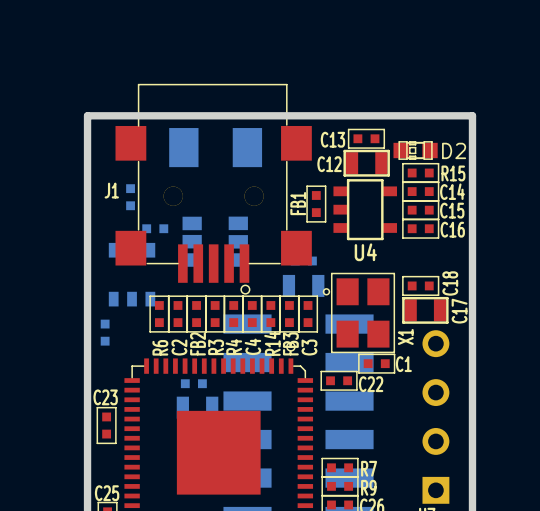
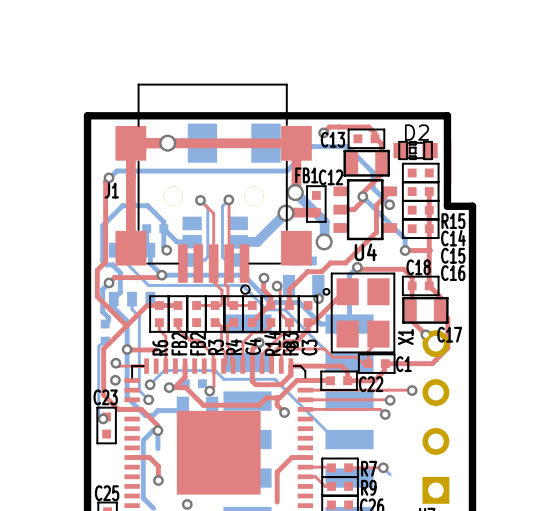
board edge: (447, 115) (472, 115) (472, 206) -> (447, 115) (447, 206) (472, 206)
top track: none -> (323, 132) (329, 127) (368, 127) (375, 133) (375, 138) (381, 143) (381, 174) (362, 193) (362, 200) (353, 209) (340, 209)
via: none -> (323, 132)
via: none -> (167, 143)
part position: (215, 147) -> (234, 143)
D2 name position: D2 (454, 150) -> D2 (417, 132)
C12 name position: C12 (329, 164) -> C12 (331, 177)
R15 name position: R15 (453, 173) -> R15 (453, 221)
top track: none -> (109, 177) (105, 181) (105, 261) (97, 270) (97, 296) (126, 326)
bottom track: none -> (109, 177) (116, 171) (287, 171) (311, 146) (347, 146) (373, 172) (373, 188) (389, 204)
via: none -> (109, 177)
top track: none -> (429, 191) (429, 285) (440, 296) (440, 310) (447, 318) (447, 348) (432, 363) (385, 363) (384, 370) (374, 380) (347, 380) (347, 371) (341, 366) (290, 366) (290, 374) (281, 384) (255, 384) (252, 381) (252, 349) (259, 342)
C14 name position: C14 (452, 191) -> C14 (453, 238)
top track: none -> (295, 192) (296, 143) (130, 143) (130, 248)
bottom track: none -> (295, 192) (324, 221) (324, 241)
via: none -> (295, 192)
top track: none -> (389, 192) (376, 205) (376, 232) (345, 262) (330, 262) (321, 271) (307, 271) (289, 289) (289, 305)
bottom track: none -> (362, 196) (405, 238) (405, 250)
via: none -> (362, 196)
bottom track: none -> (228, 199) (222, 206) (222, 257) (225, 260) (238, 260)
via: none -> (228, 199)
top track: none -> (200, 200) (213, 213) (213, 282) (221, 290) (221, 304) (196, 305)
bottom track: none -> (200, 200) (207, 207) (207, 257) (204, 260) (192, 260)
via: none -> (200, 200)
top track: none -> (229, 200) (229, 275) (225, 279) (225, 284) (227, 287) (227, 304) (252, 305)
FB1 name rotation: 0° (298, 203) -> 90° clockwise (306, 175)
via: none -> (389, 204)
C15 name position: C15 (452, 210) -> C15 (453, 255)
top track: none -> (316, 212) (286, 213)
bottom track: none -> (286, 213) (257, 241) (238, 241)
via: none -> (286, 213)
bottom track: none -> (146, 228) (146, 246) (150, 250) (150, 263) (161, 275) (243, 275) (270, 302) (299, 302) (320, 324) (349, 324) (349, 275) (357, 267)
bottom track: none -> (163, 228) (177, 241) (191, 241)
C16 name position: C16 (452, 229) -> C16 (453, 273)
via: none -> (324, 241)
bottom track: none -> (113, 250) (148, 285) (242, 285) (266, 309) (285, 309) (337, 362) (349, 362)
bottom track: none -> (166, 250) (163, 247) (163, 221) (147, 205) (122, 205) (102, 225) (102, 260) (106, 264) (112, 264) (120, 272) (120, 292) (113, 299) (113, 307) (127, 321) (127, 397) (145, 415) (153, 415) (157, 410) (177, 410)
via: none -> (166, 250)
top track: none -> (405, 250) (430, 250)
via: none -> (405, 250)
top track: none -> (357, 267) (359, 269) (403, 269) (412, 277) (410, 319) (425, 334)
via: none -> (357, 267)
top track: none -> (161, 275) (159, 277) (114, 277) (109, 282)
via: none -> (161, 275)
top track: none -> (264, 278) (263, 289) (270, 297) (270, 305) (252, 322)
via: none -> (264, 278)
bottom track: none -> (109, 282) (102, 289) (102, 311) (108, 317) (108, 321)
via: none -> (109, 282)
C18 name rotation: 0° (450, 283) -> 90° clockwise (418, 267)
C18 name position: C18 (450, 283) -> C18 (418, 267)
top track: none -> (277, 286) (280, 289) (280, 313) (289, 322) (289, 330) (286, 334) (282, 334) (262, 354) (262, 366)
via: none -> (277, 286)
top track: none -> (347, 291) (344, 291) (313, 322) (308, 322) (308, 329) (296, 341) (285, 341) (271, 355) (271, 366)
via: none -> (318, 298)
bottom track: none -> (132, 299) (132, 309) (139, 316) (139, 390) (148, 399)
top track: none -> (177, 305) (147, 305) (103, 348) (103, 394) (118, 409) (141, 409) (157, 425) (157, 430)
C17 name rotation: 0° (459, 311) -> 90° clockwise (449, 334)
top track: none -> (159, 322) (159, 329) (165, 336) (165, 366)
top track: none -> (177, 322) (177, 327) (190, 340) (198, 340) (213, 354) (213, 386) (209, 391)
top track: none -> (215, 322) (221, 326) (221, 348) (225, 352) (225, 363) (223, 366)
top track: none -> (233, 322) (227, 325) (227, 346) (231, 350) (233, 366)
top track: none -> (270, 322) (270, 326) (264, 332) (253, 332) (242, 342) (242, 366)
top track: none -> (378, 334) (378, 341) (368, 351) (368, 363) (363, 363) (356, 357) (332, 357) (324, 348) (287, 348) (281, 355) (281, 366)
via: none -> (425, 334)
bottom track: none -> (108, 338) (98, 346) (98, 414) (103, 418)
via: none -> (259, 342)
C2 name: C2 (179, 347) -> FB2 (179, 343)
top track: none -> (127, 349) (155, 349)
via: none -> (127, 349)
top track: none -> (115, 363) (118, 366) (146, 366)
via: none -> (115, 363)
top track: none -> (185, 366) (185, 377) (174, 387)
via: none -> (115, 380)
top track: none -> (330, 380) (297, 380) (279, 397) (266, 397) (259, 405) (203, 405) (185, 387) (169, 387)
bottom track: none -> (150, 384) (164, 370) (215, 370) (223, 379) (274, 379) (335, 439) (349, 439)
via: none -> (150, 384)
via: none -> (169, 387)
top track: none -> (305, 390) (412, 390)
via: none -> (412, 390)
via: none -> (209, 391)
top track: none -> (277, 397) (277, 405) (284, 412)
via: none -> (148, 399)
top track: none -> (305, 399) (390, 400)
via: none -> (390, 400)
top track: none -> (305, 409) (380, 409) (385, 414)
via: none -> (284, 412)
via: none -> (385, 414)
via: none -> (103, 418)
via: none -> (157, 430)
bottom track: none -> (157, 448) (157, 430) (153, 430) (143, 440) (143, 498) (153, 508)
top track: none -> (132, 457) (149, 457) (158, 466) (158, 480)
top track: none -> (305, 457) (291, 457) (277, 472) (277, 502)
top track: none -> (305, 467) (331, 467)
top track: none -> (348, 467) (383, 467)
bottom track: none -> (383, 467) (390, 474)
via: none -> (383, 467)
top track: none -> (305, 476) (315, 476) (325, 486) (331, 486)
via: none -> (158, 480)
via: none -> (187, 504)

